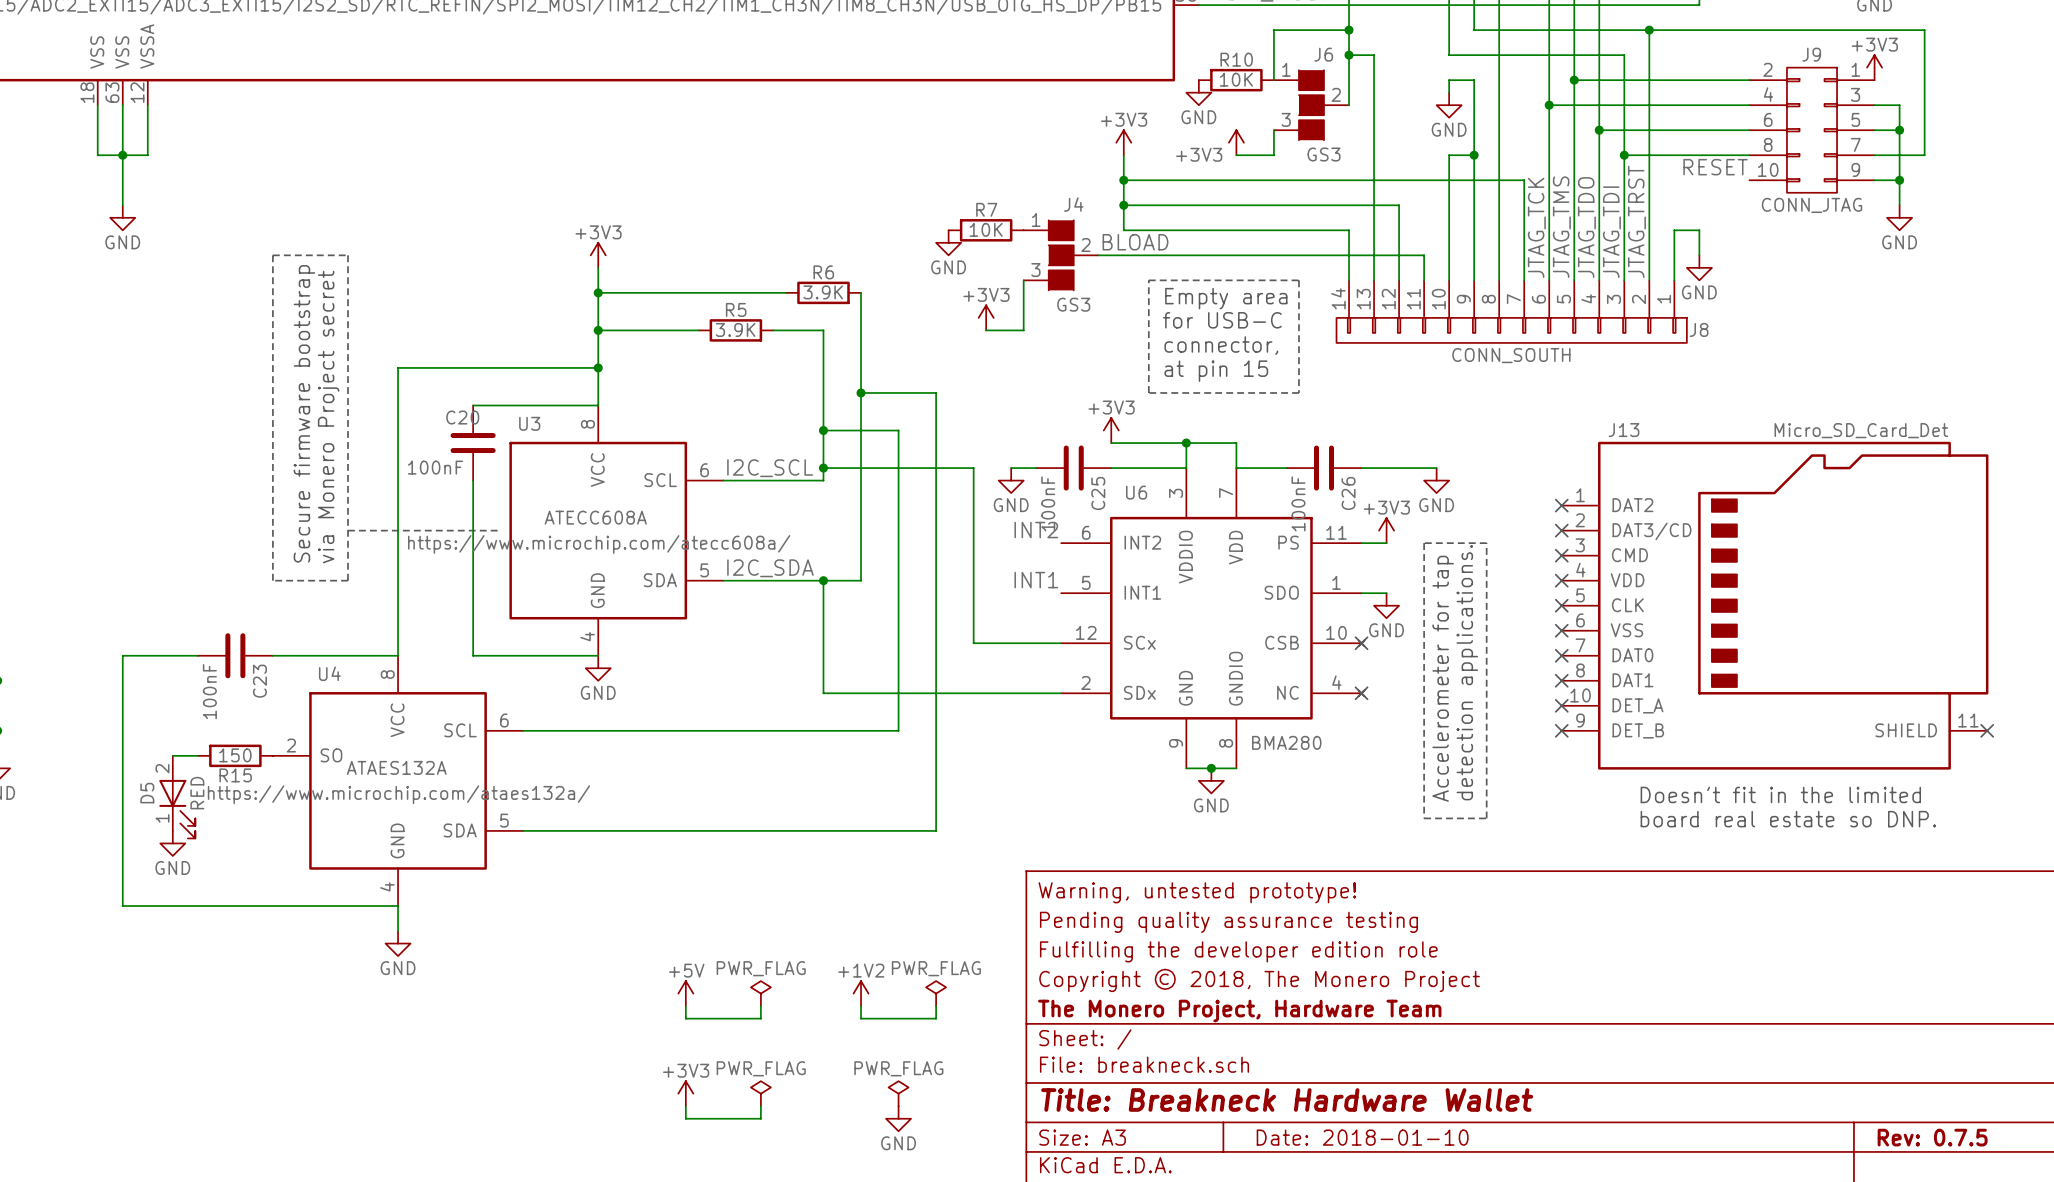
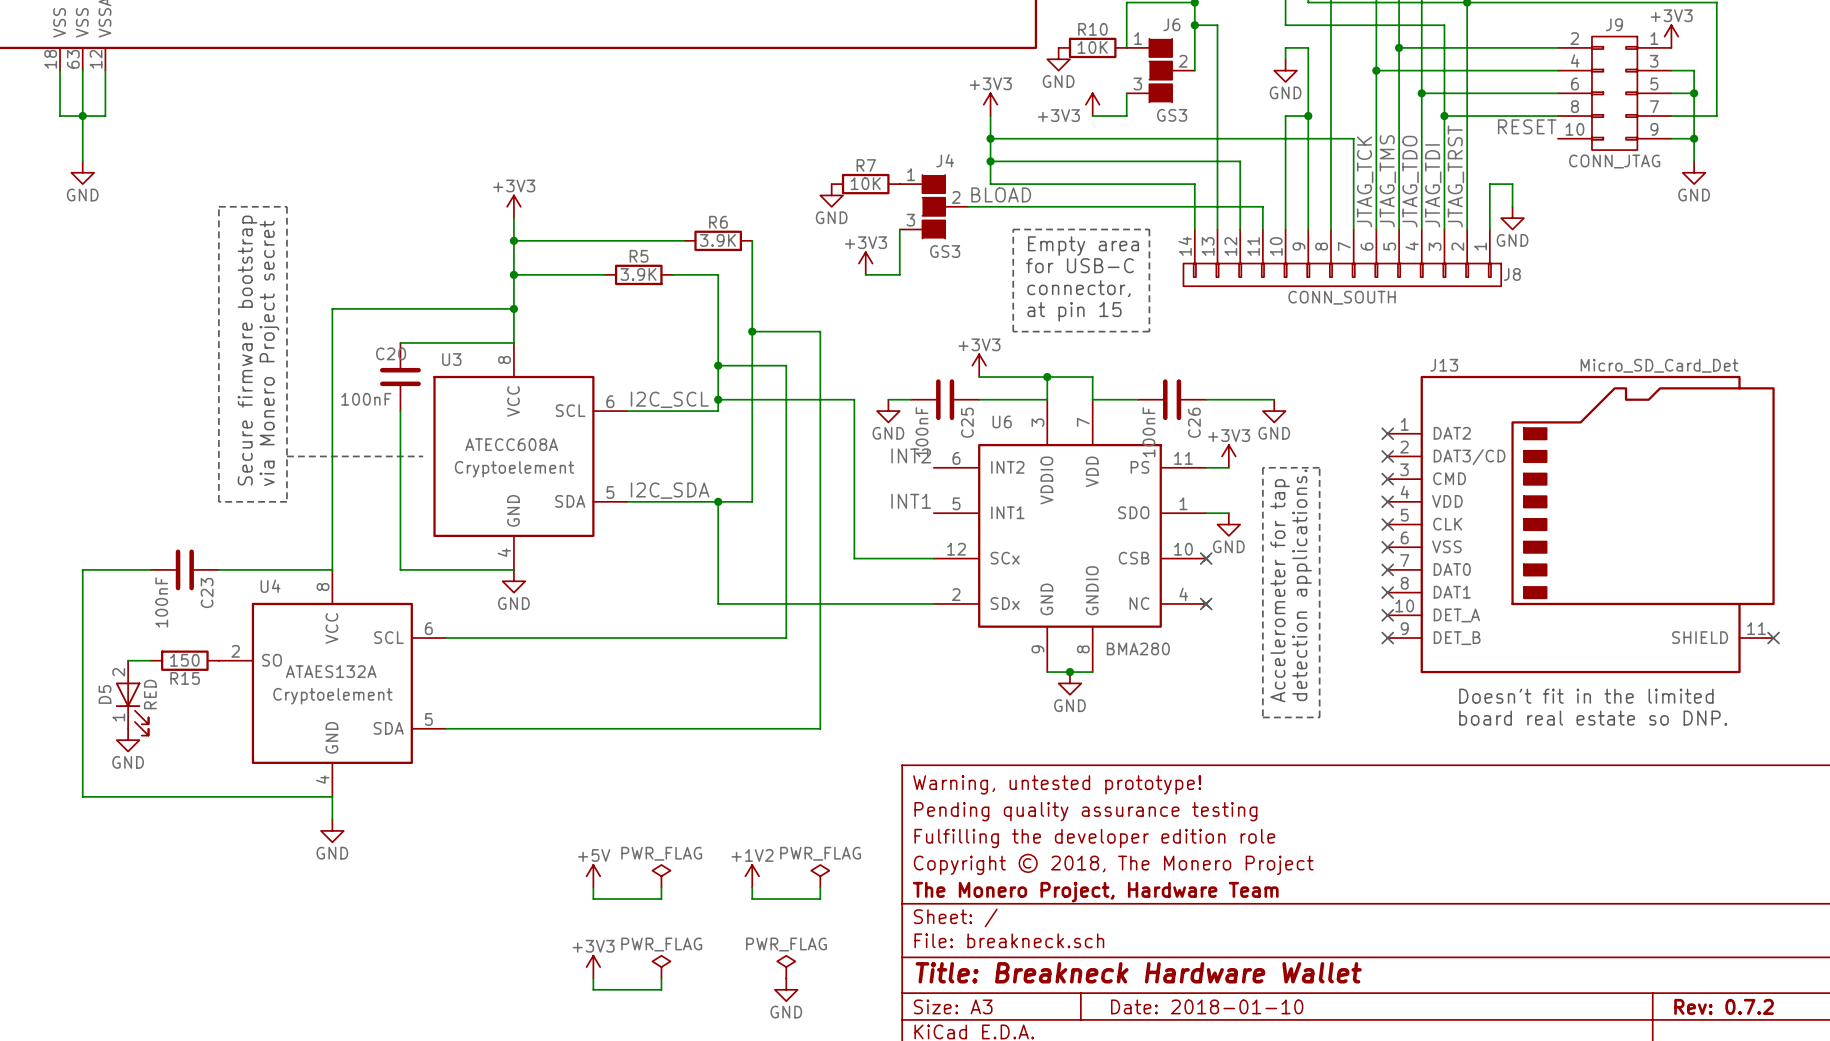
U3 text: https://www.microchip.com/atecc608a/ (599, 544) -> Cryptoelement (514, 469)
U4 text: https://www.microchip.com/ataes132a/ (398, 794) -> Cryptoelement (332, 696)
title block: Rev: 0.7.5 (1932, 1137) -> Rev: 0.7.2 (1724, 1006)

